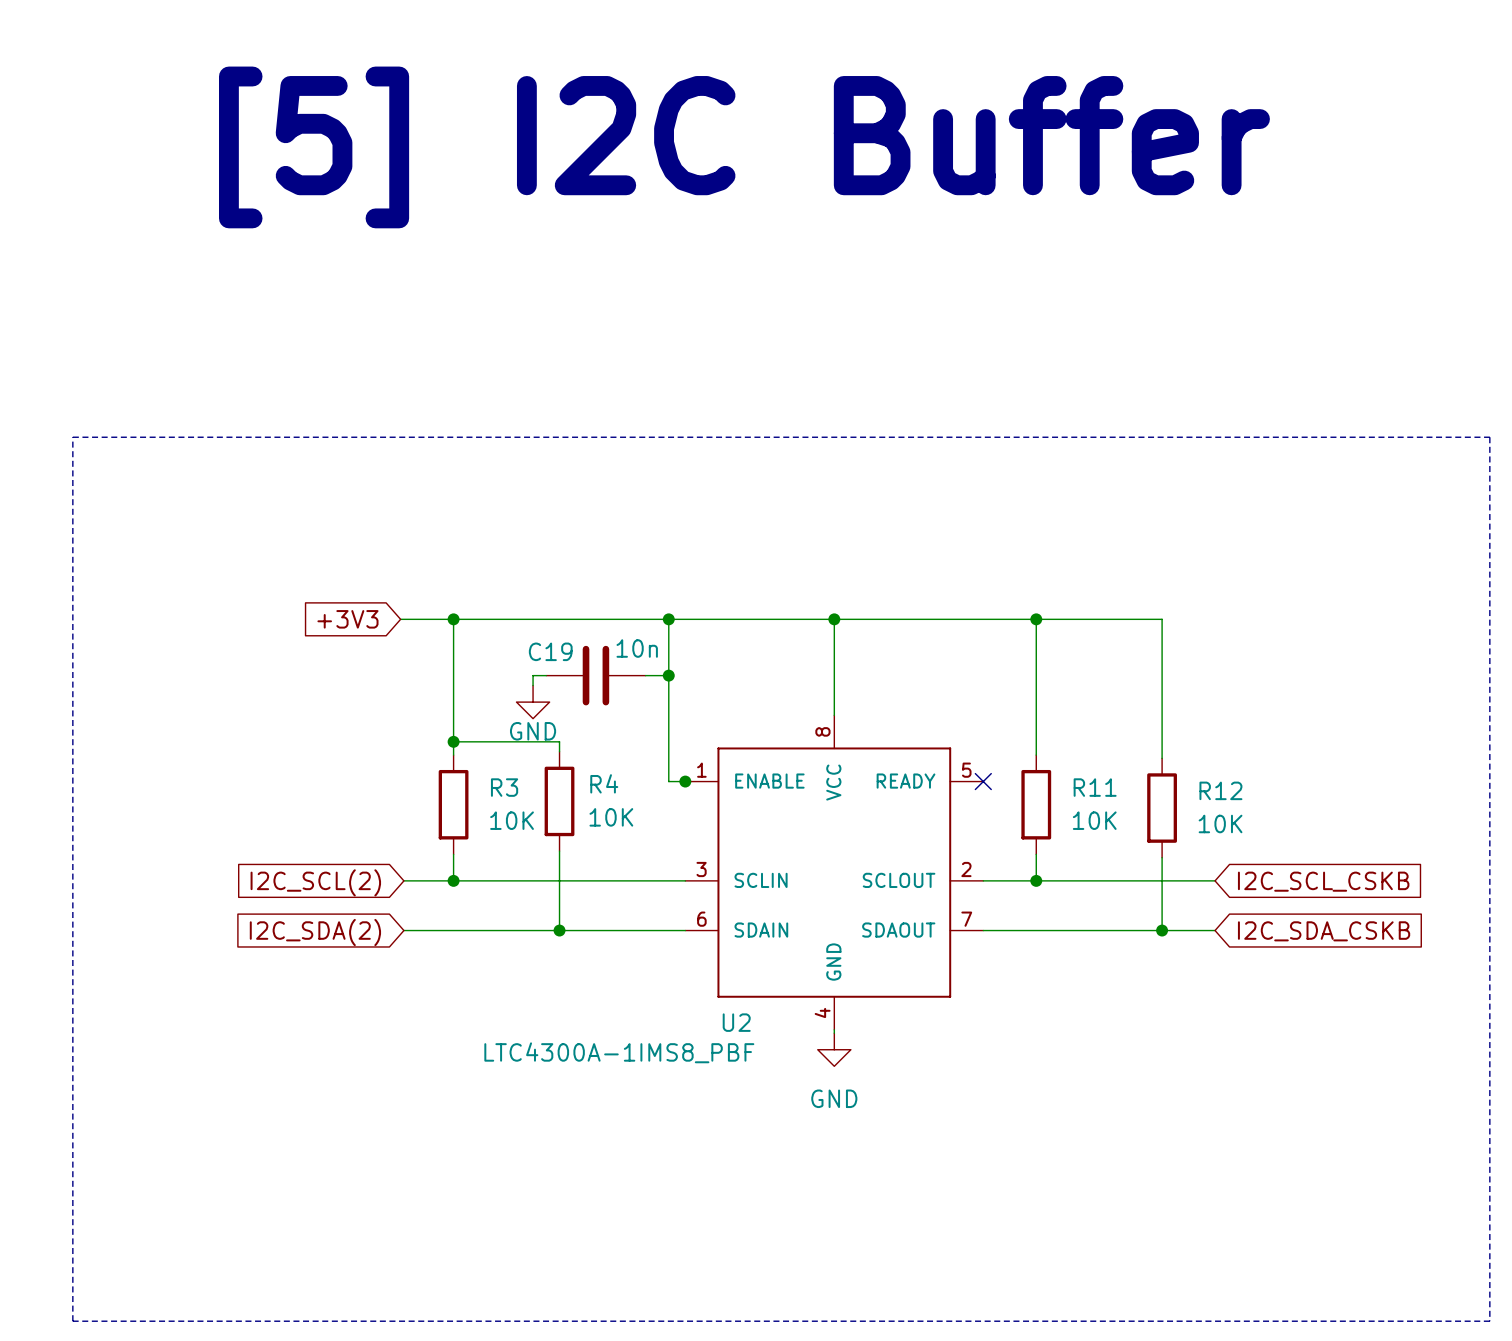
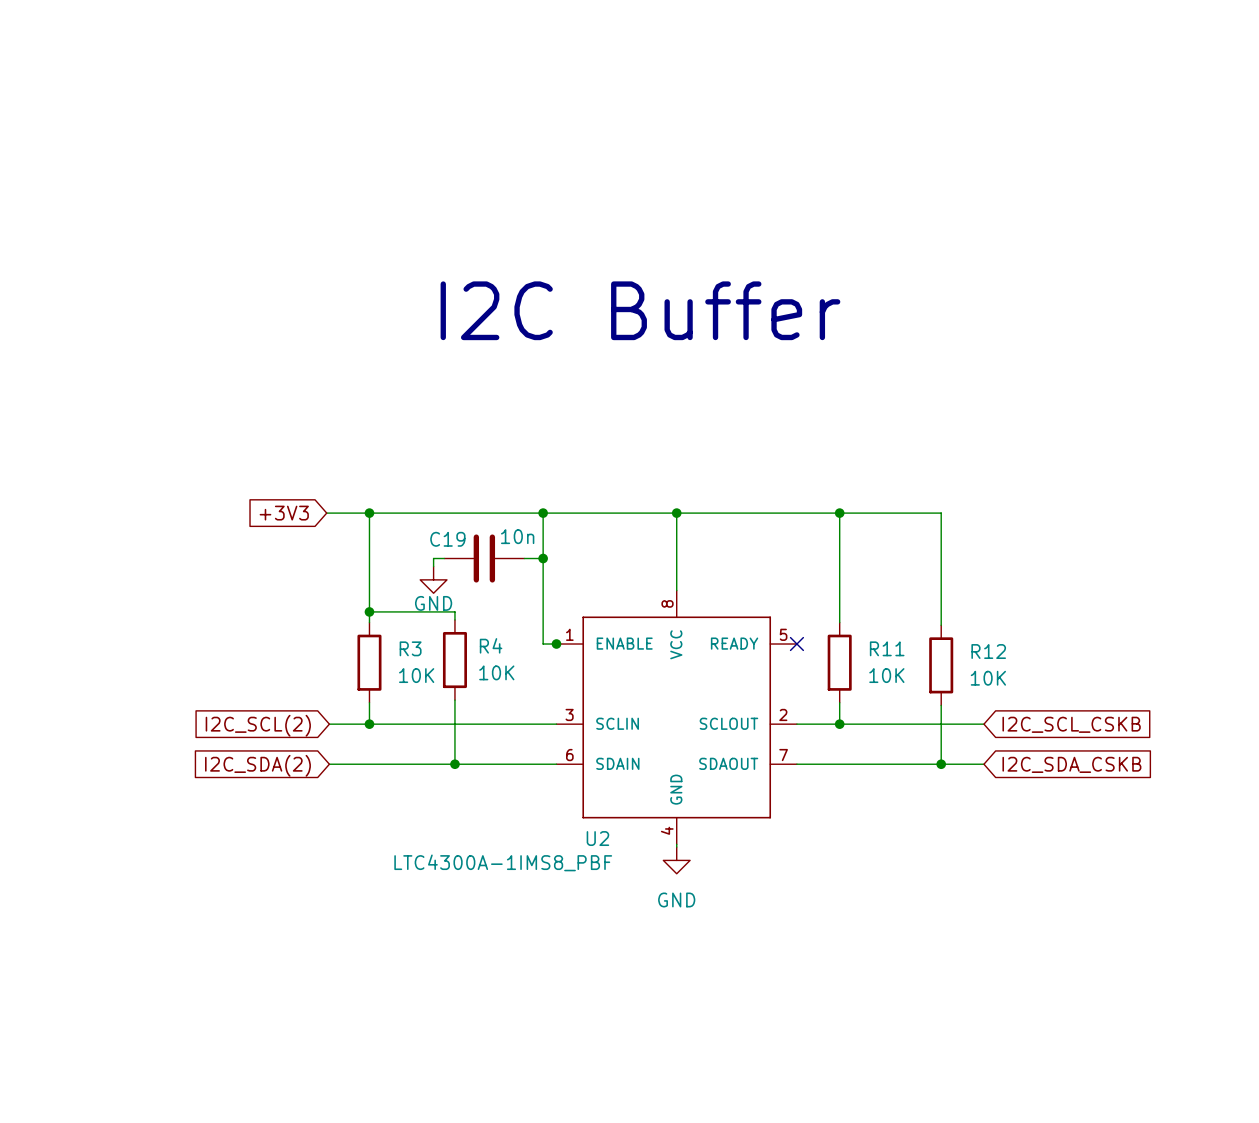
text: [5] I2C Buffer (744, 147) -> none
text: none -> I2C Buffer (640, 310)
line: (72, 437) (1489, 437) (1489, 1321) (72, 1321) (72, 437) -> none

